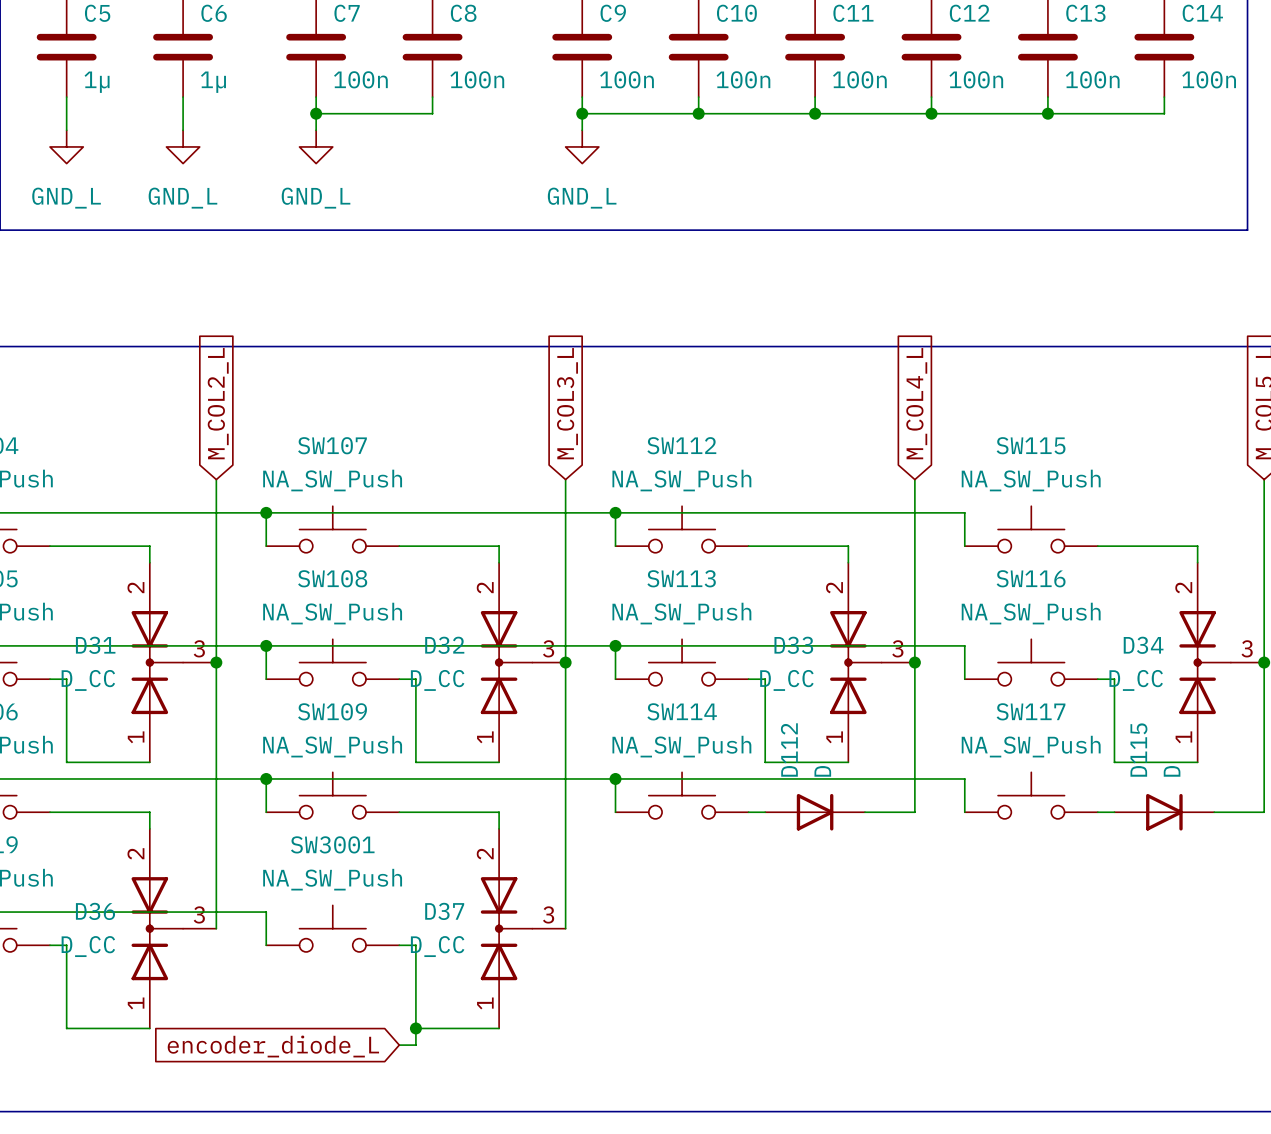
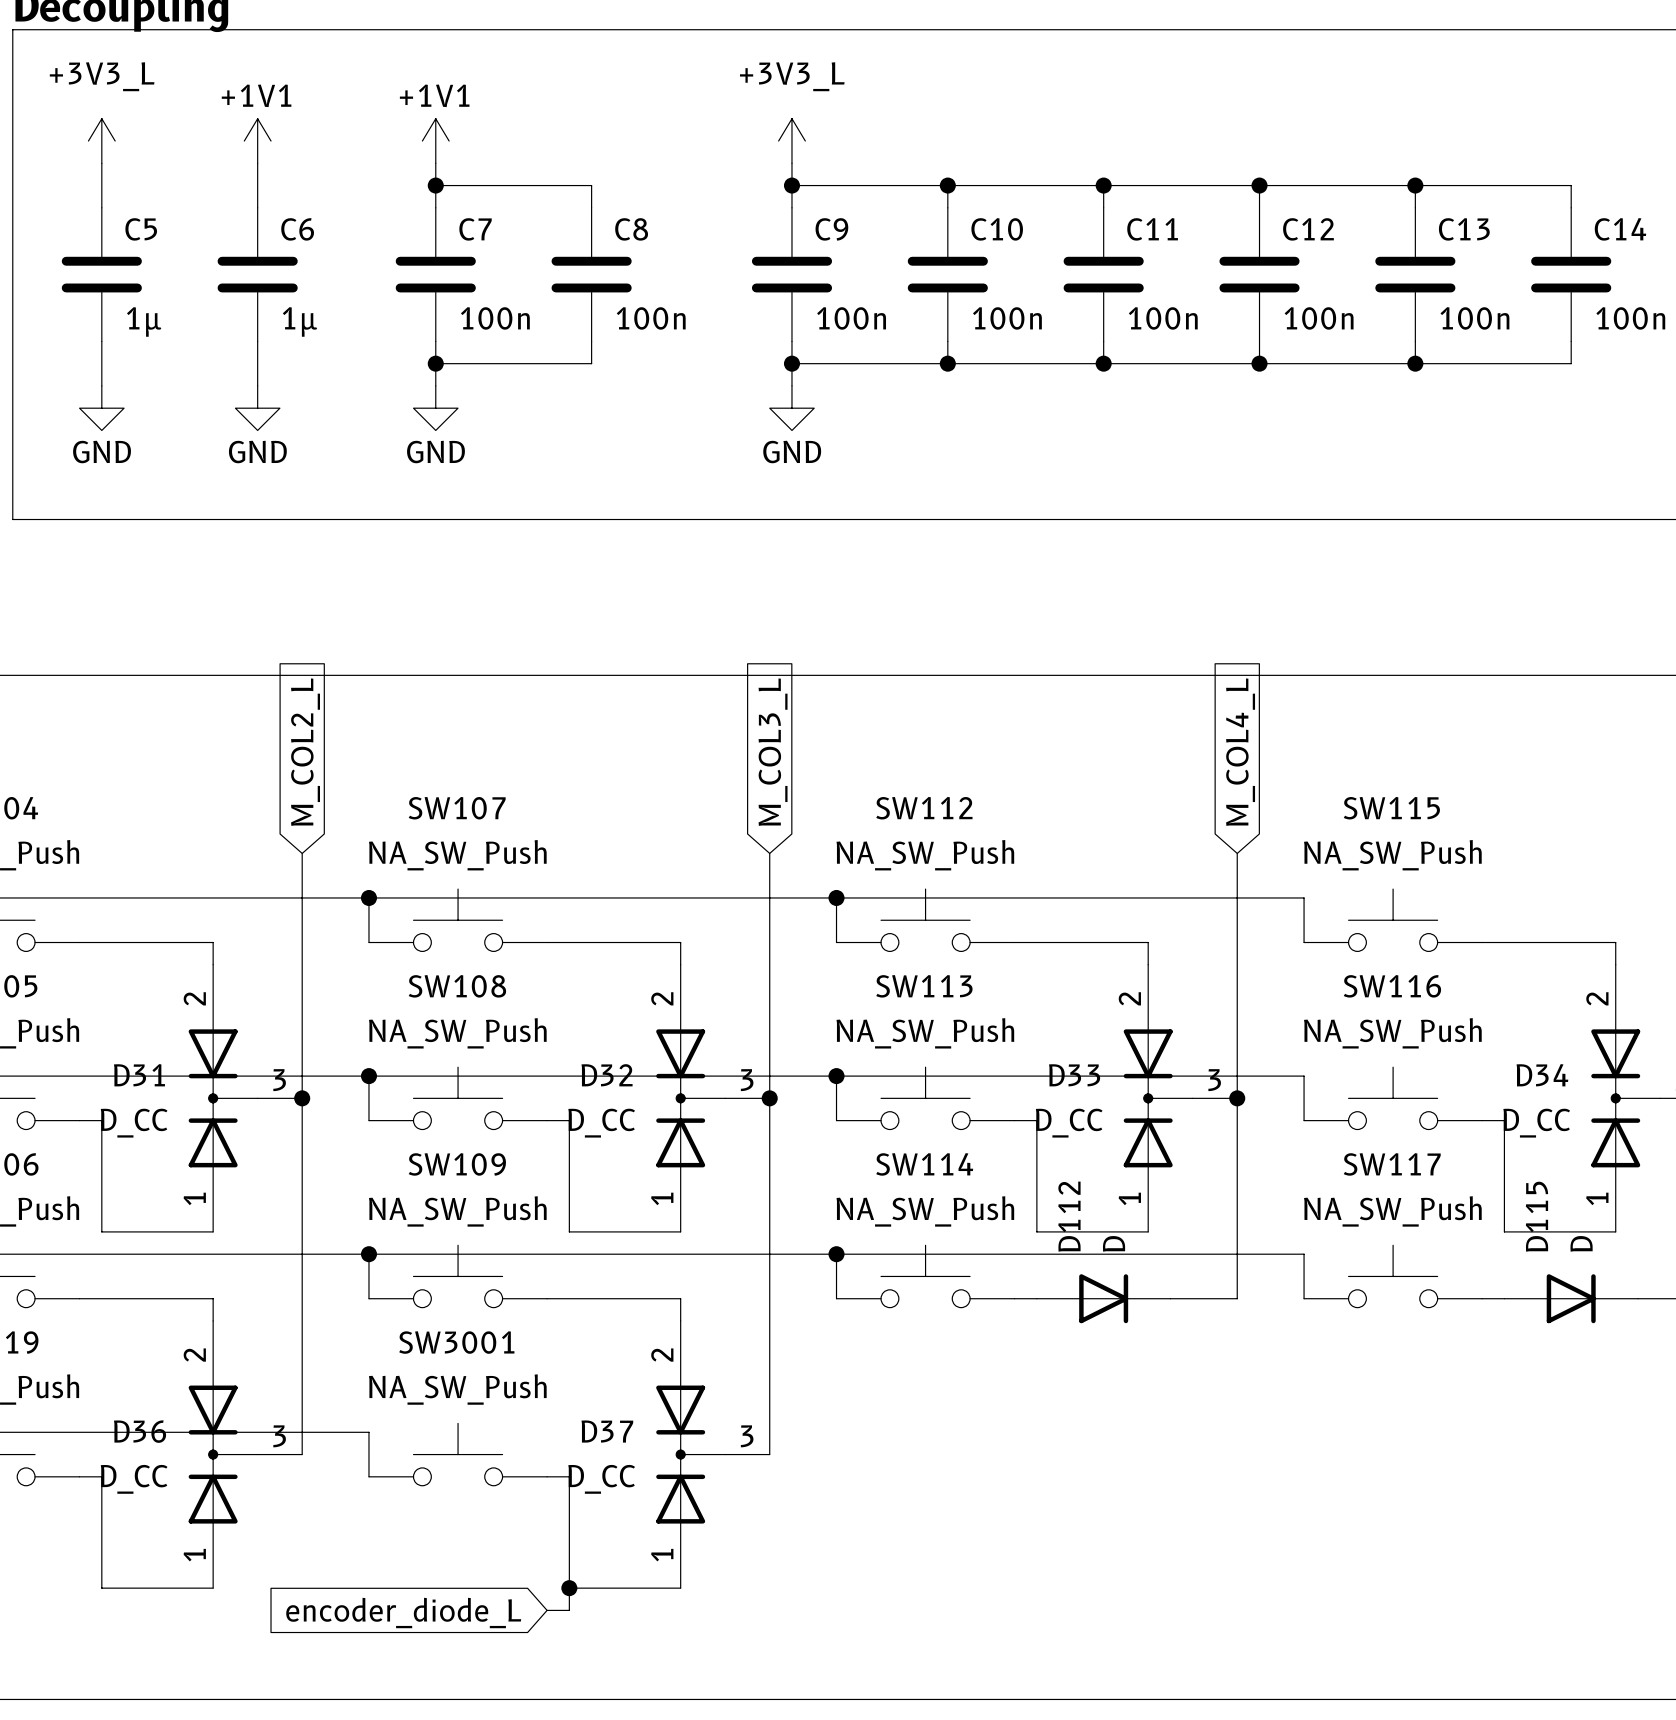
power symbol: GND_L (66, 146) -> GND (101, 408)
power symbol: GND_L (183, 146) -> GND (257, 408)
power symbol: GND_L (316, 146) -> GND (435, 408)
power symbol: GND_L (582, 146) -> GND (791, 408)

